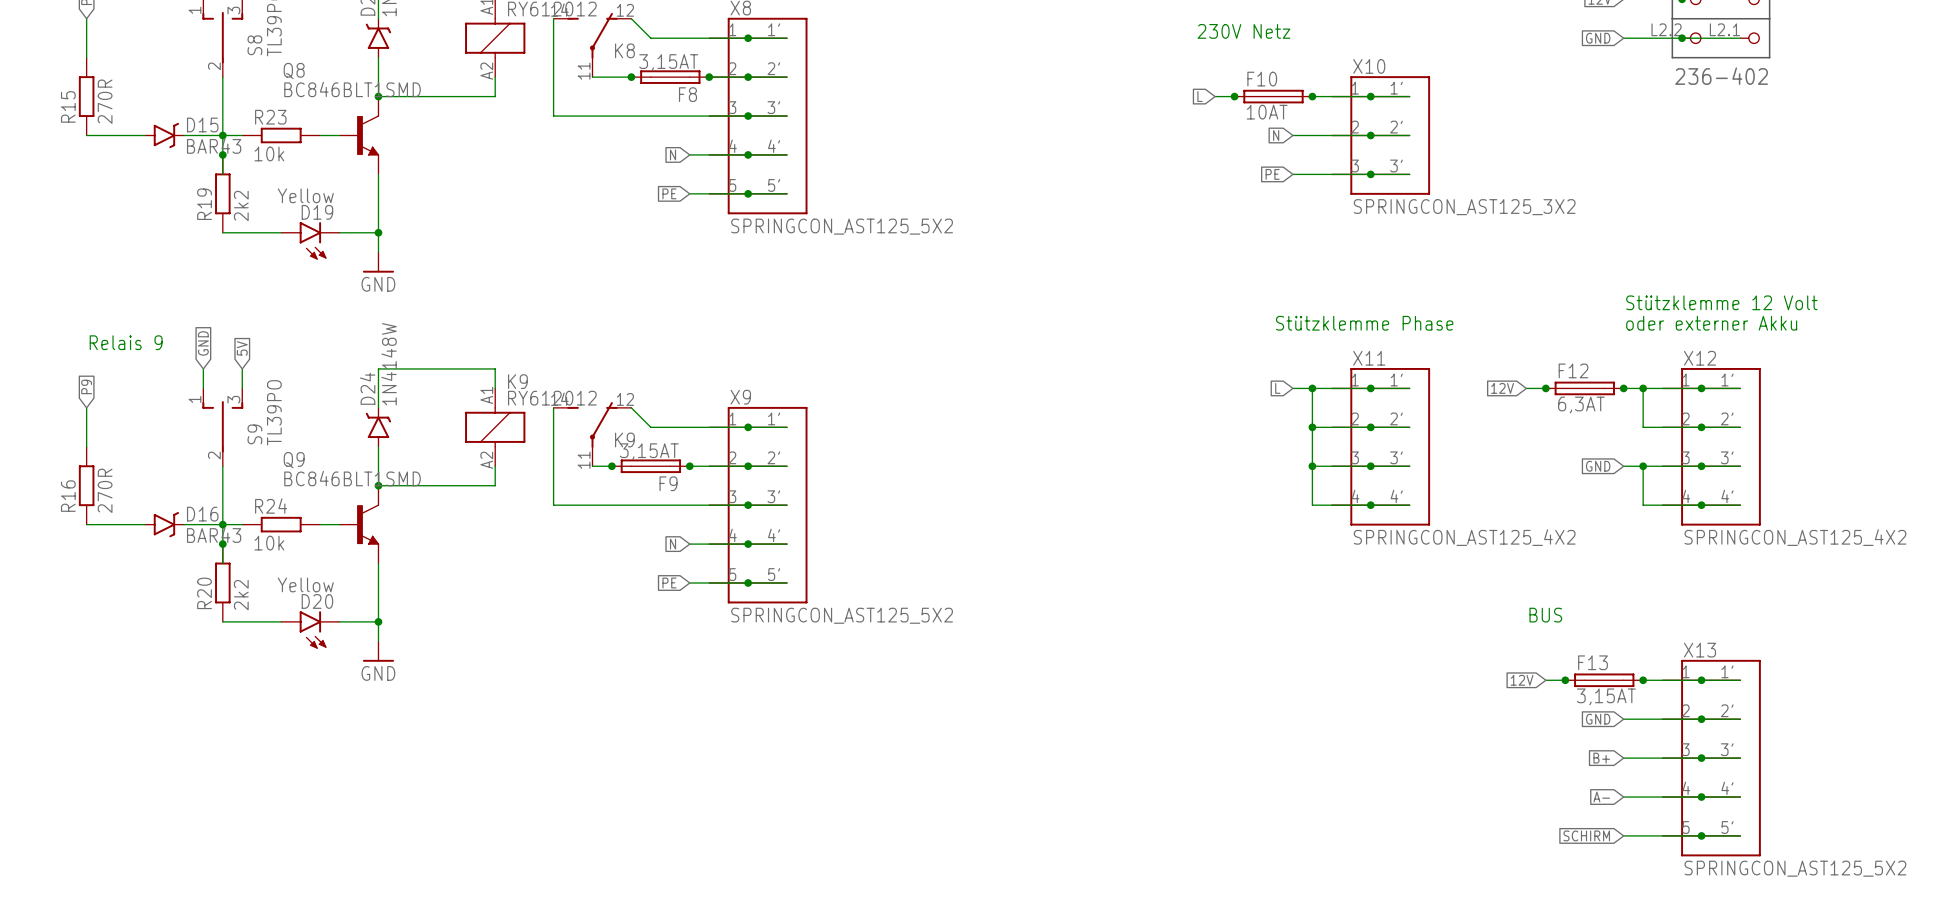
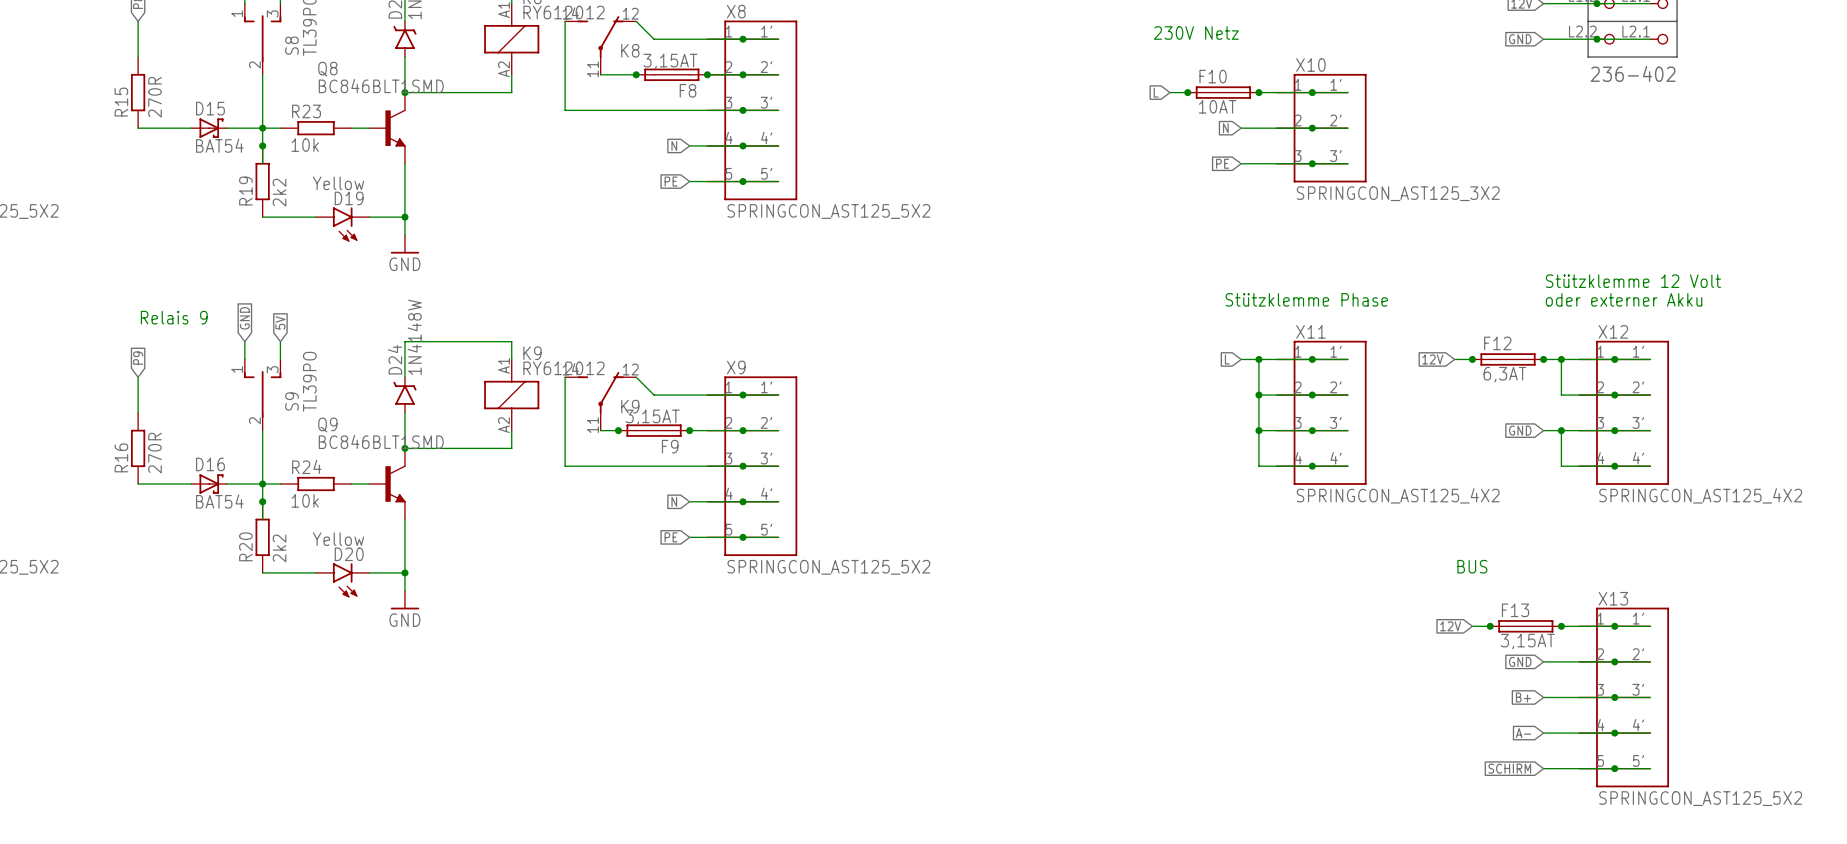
D15 symbol: [144, 122, 185, 149] -> [191, 118, 228, 138]
D15 name position: D15 (202, 124) -> D15 (210, 108)
D15 value: BAR43 (214, 146) -> BAT54 (219, 145)
D16 symbol: [144, 511, 185, 538] -> [191, 474, 228, 494]
D16 name position: D16 (202, 514) -> D16 (210, 464)
D16 value: BAR43 (214, 535) -> BAT54 (219, 501)

